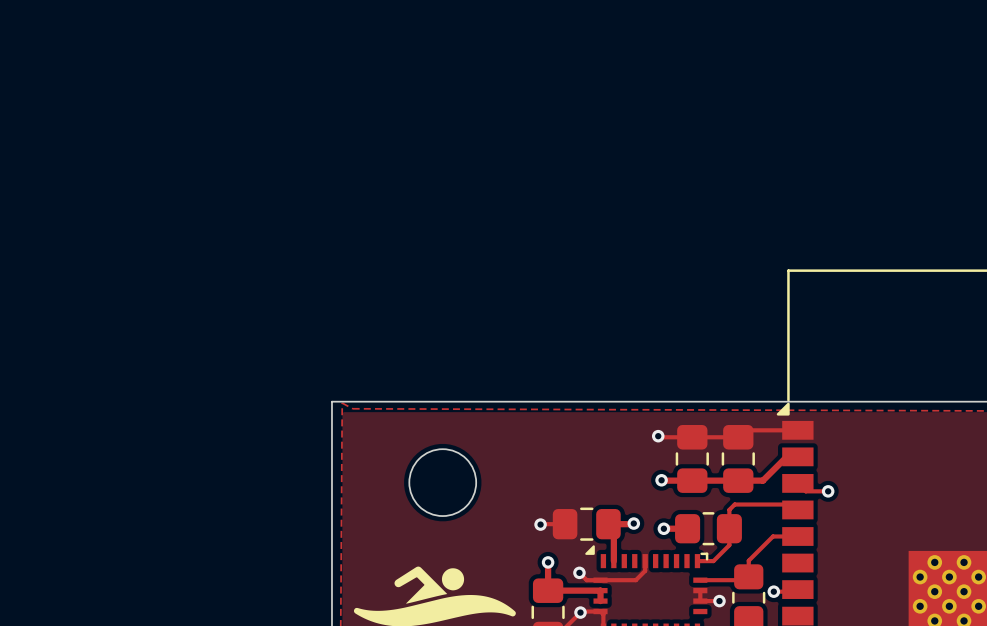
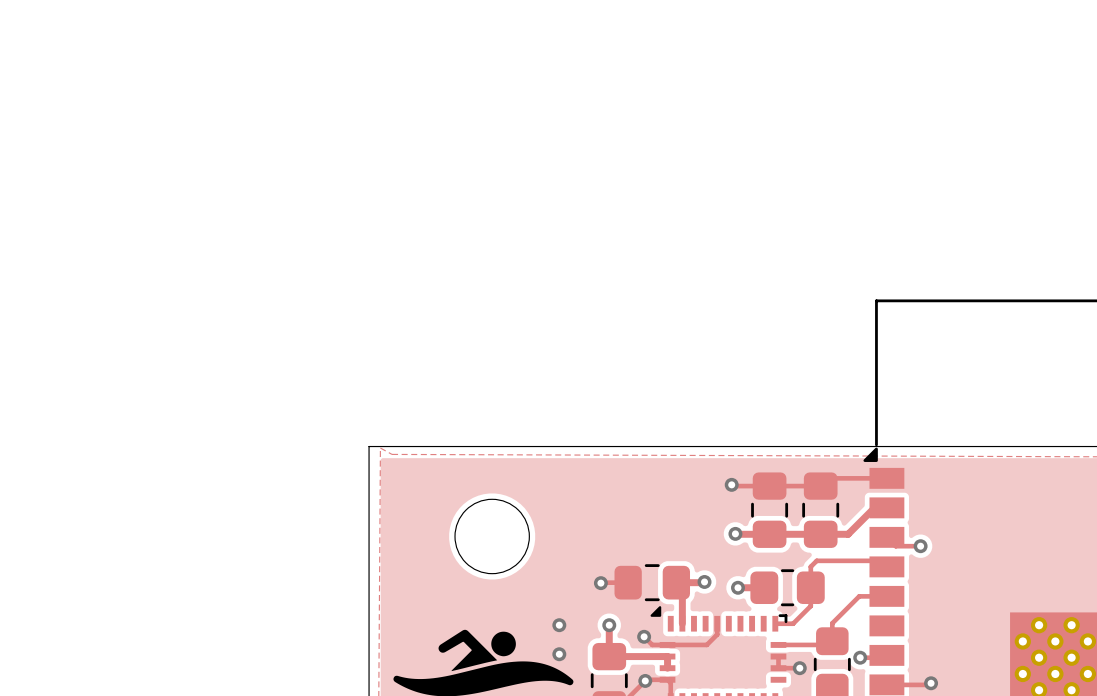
via: none -> (559, 625)
via: none -> (559, 654)
track: none -> (931, 683) (929, 684) (886, 684)
via: none -> (931, 683)

